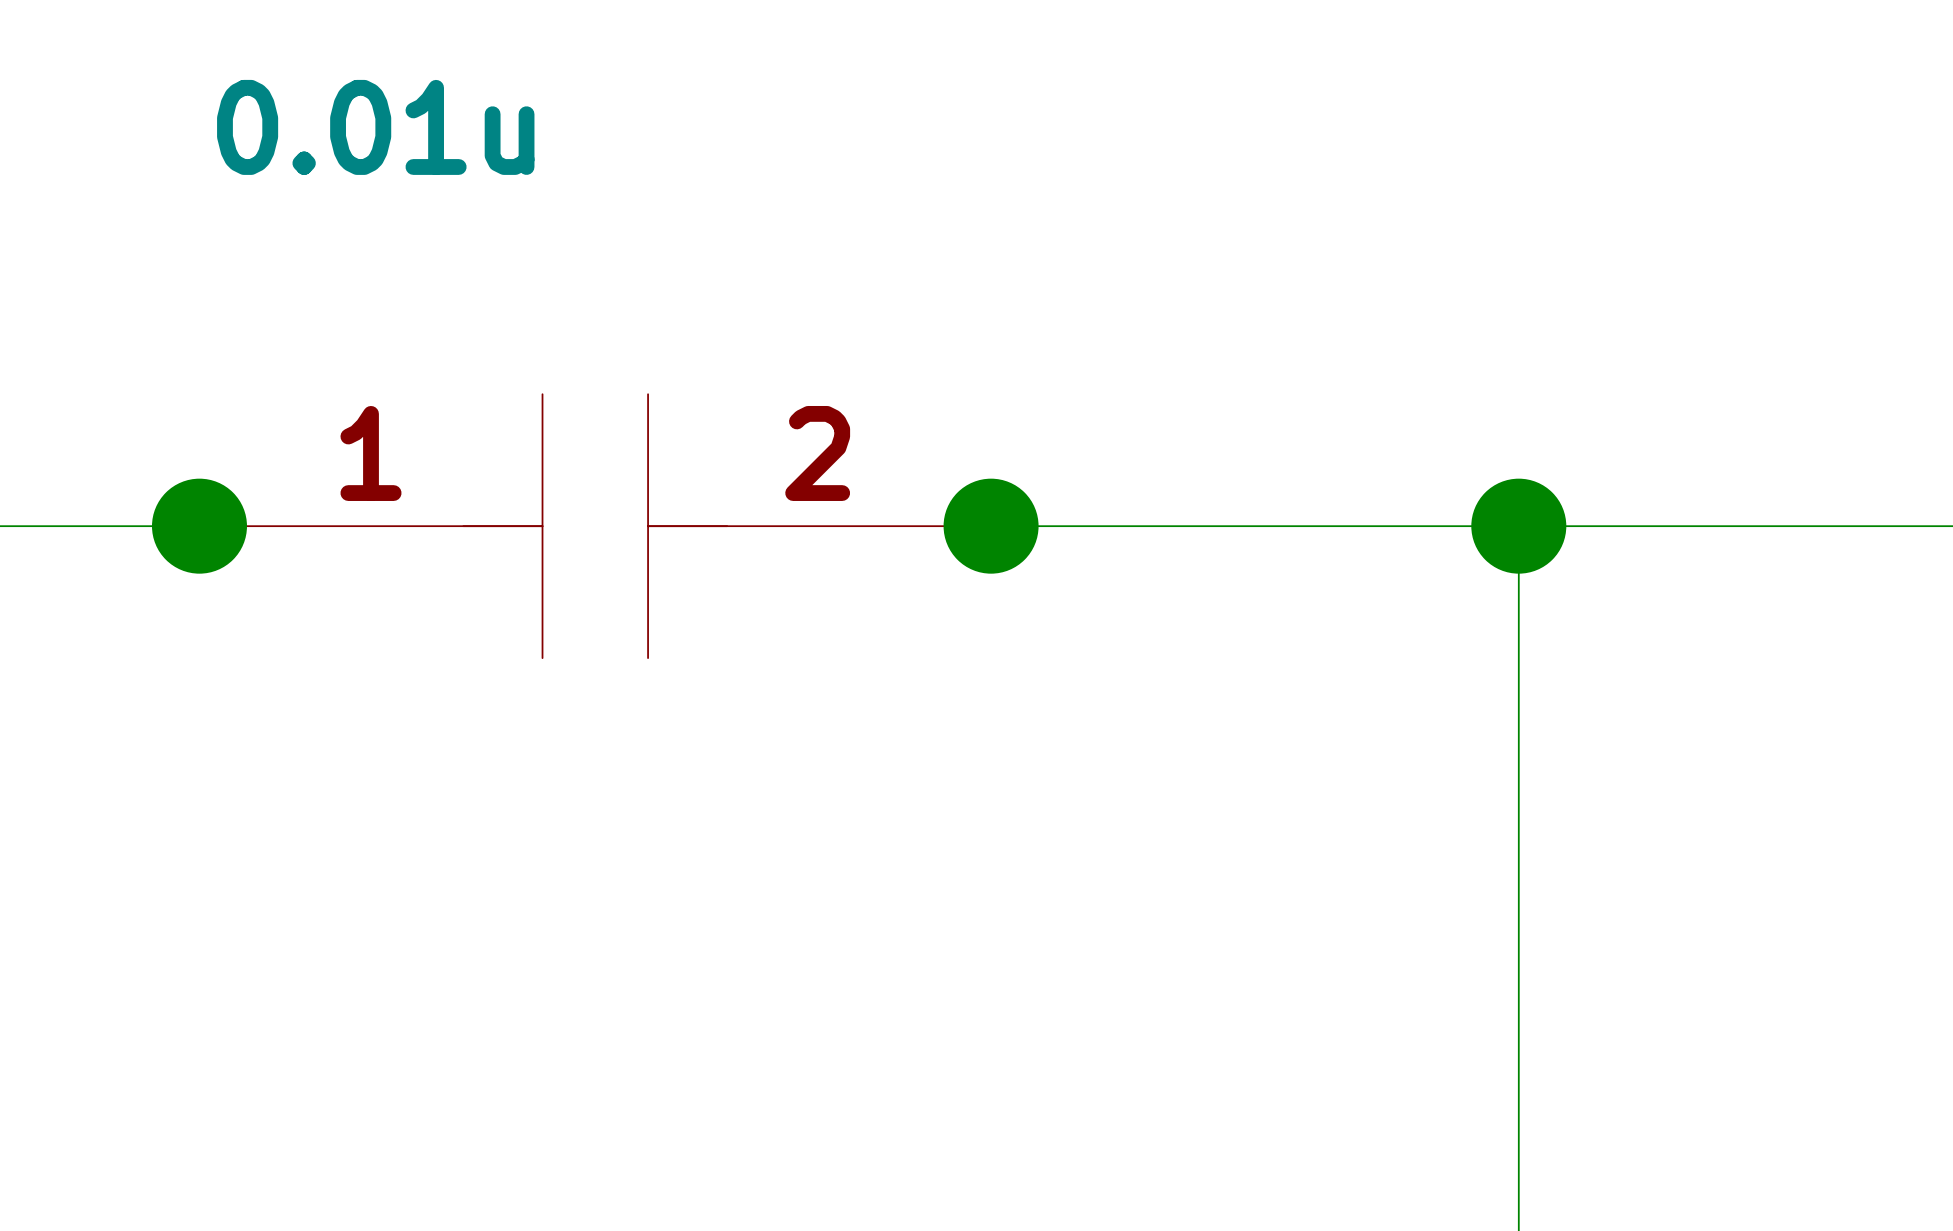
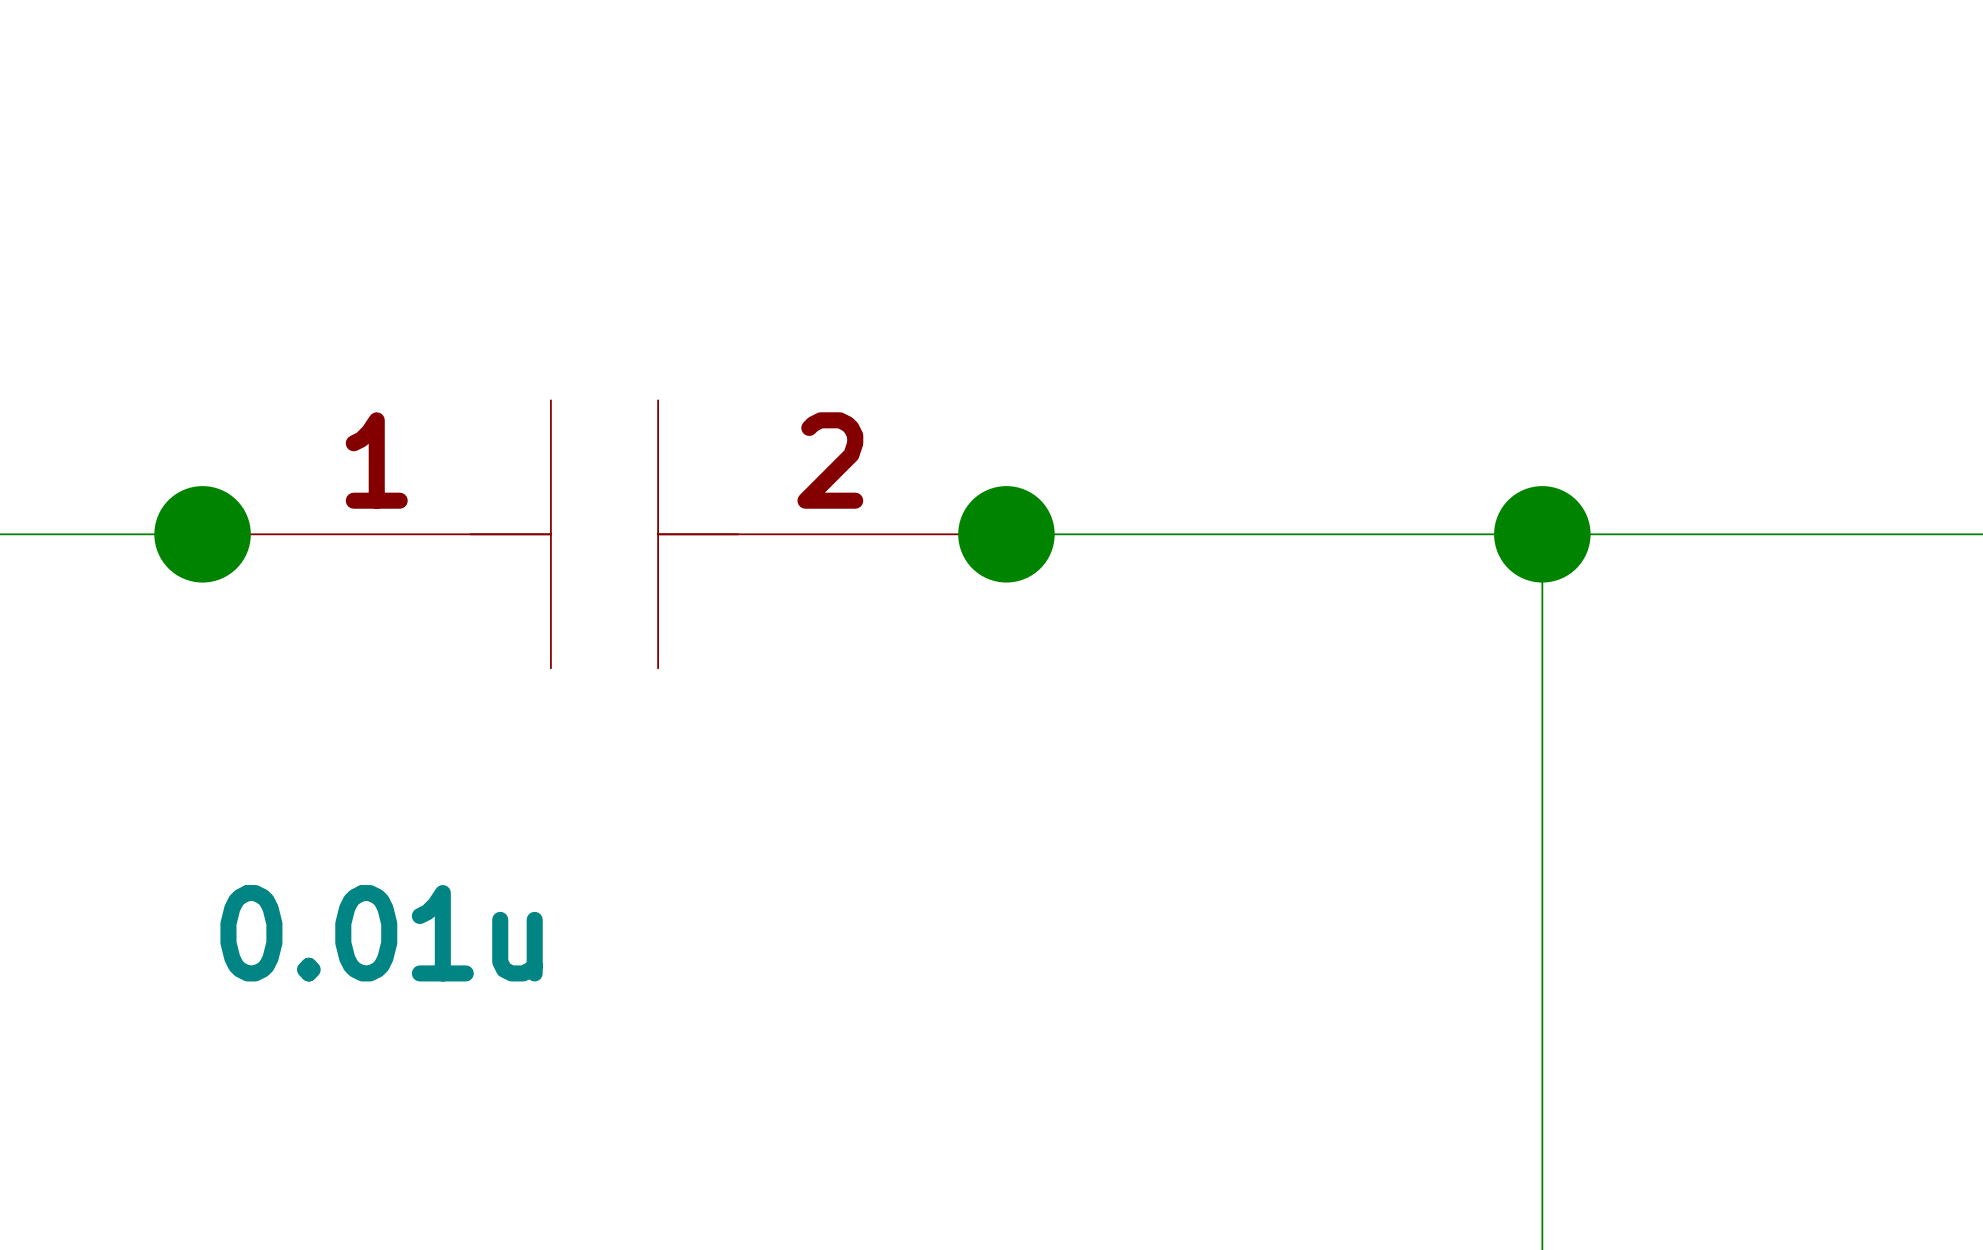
part value position: 0.01u (375, 127) -> 0.01u (381, 933)

